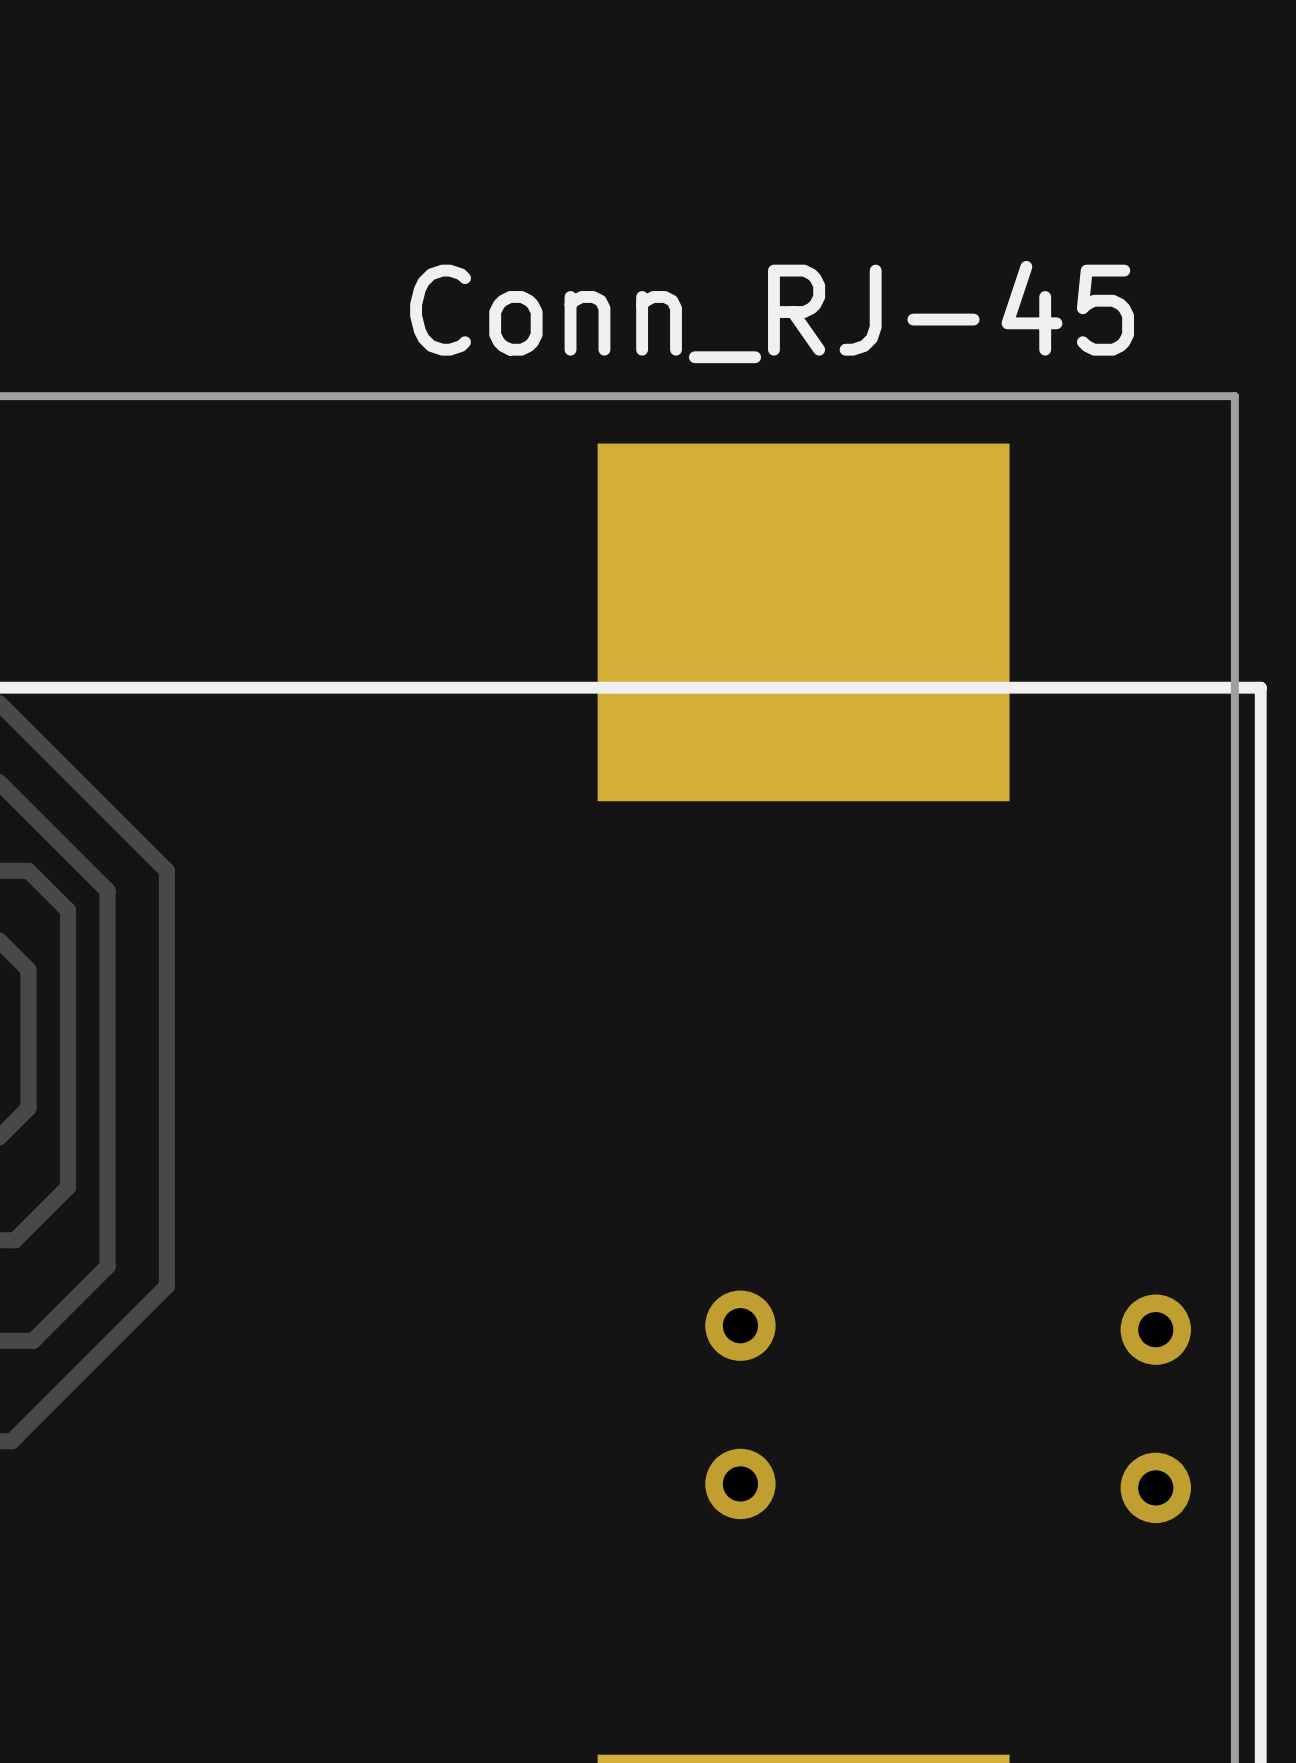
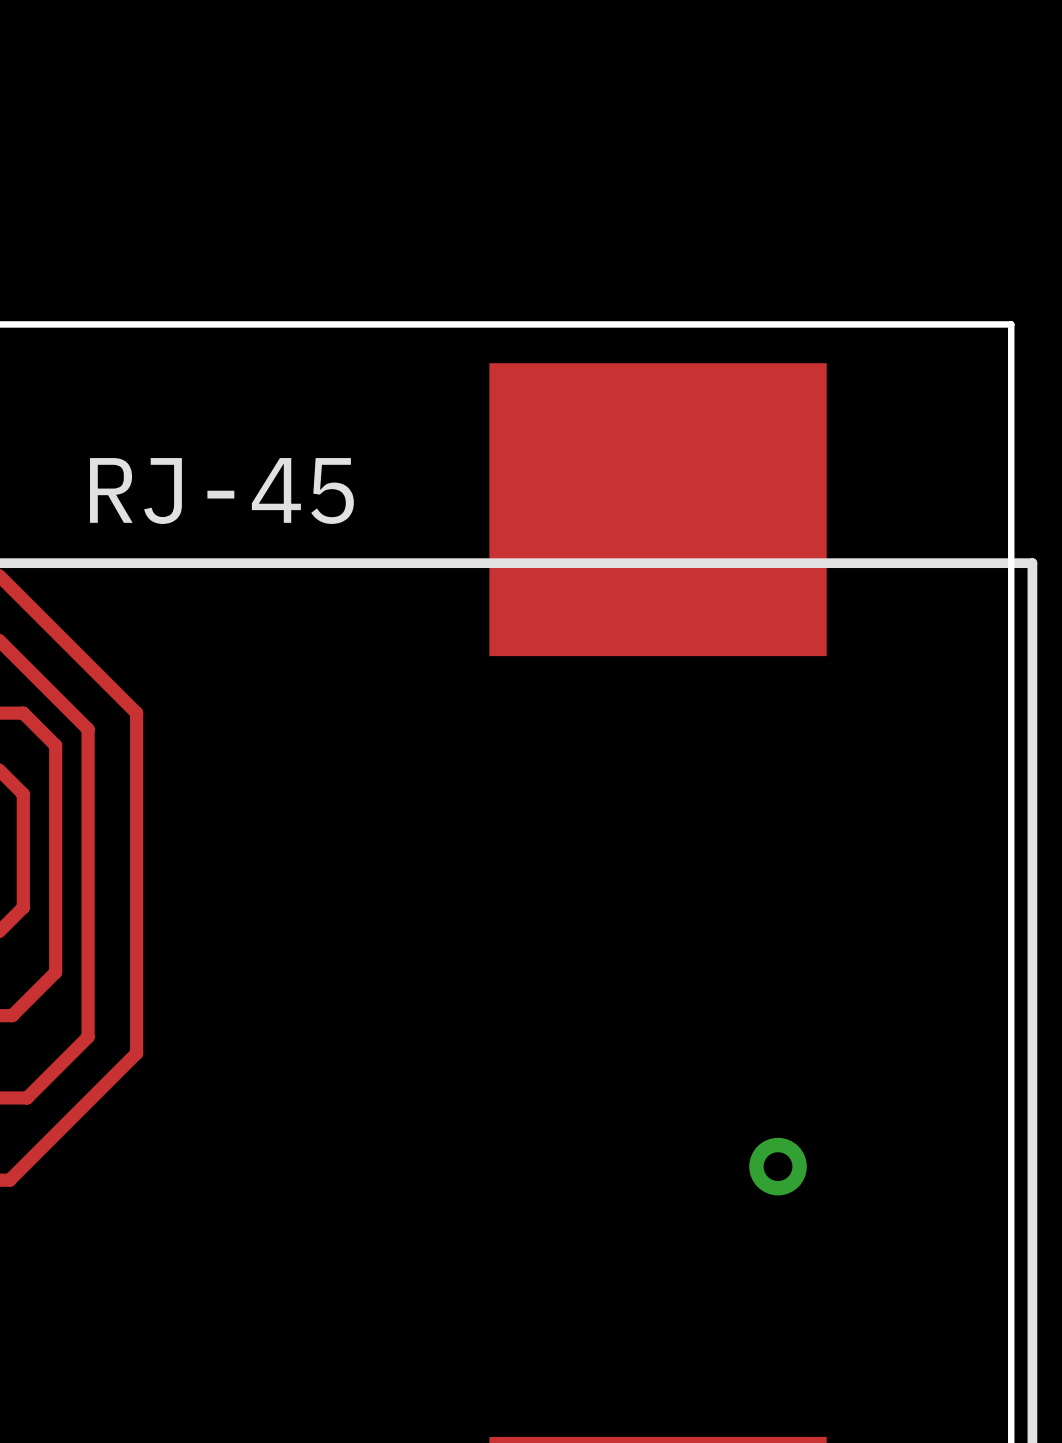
part value: Conn_RJ-45 (772, 312) -> RJ-45 (221, 491)
via: (740, 1325) -> none
via: (1155, 1329) -> none
via: none -> (778, 1166)
via: (740, 1483) -> none
via: (1155, 1487) -> none

